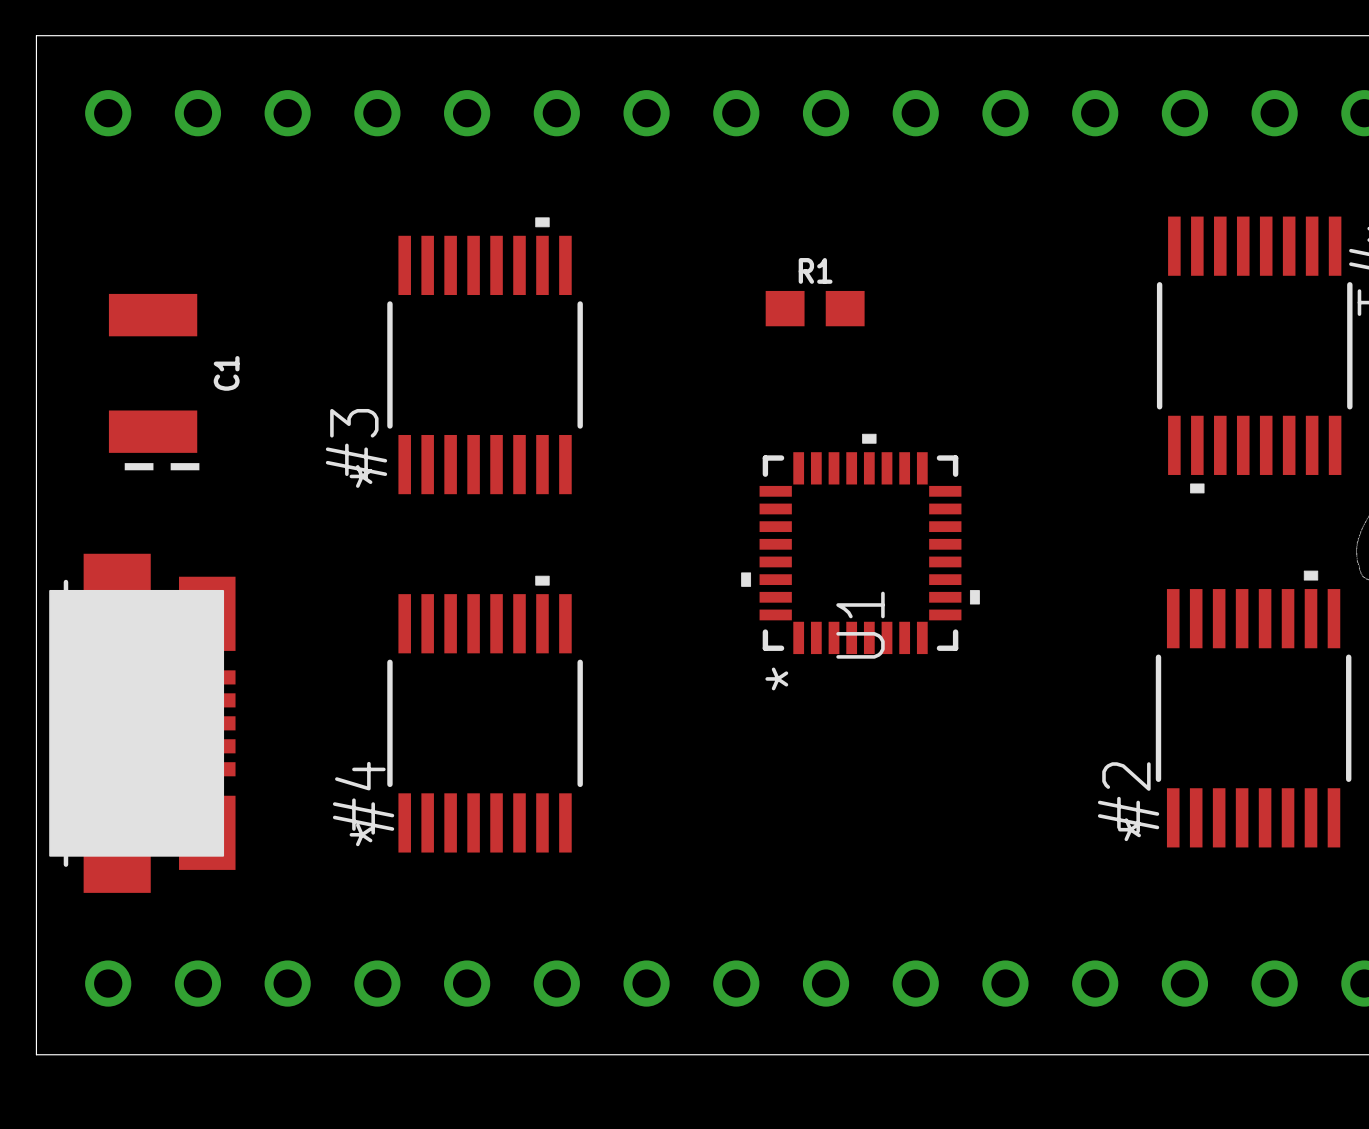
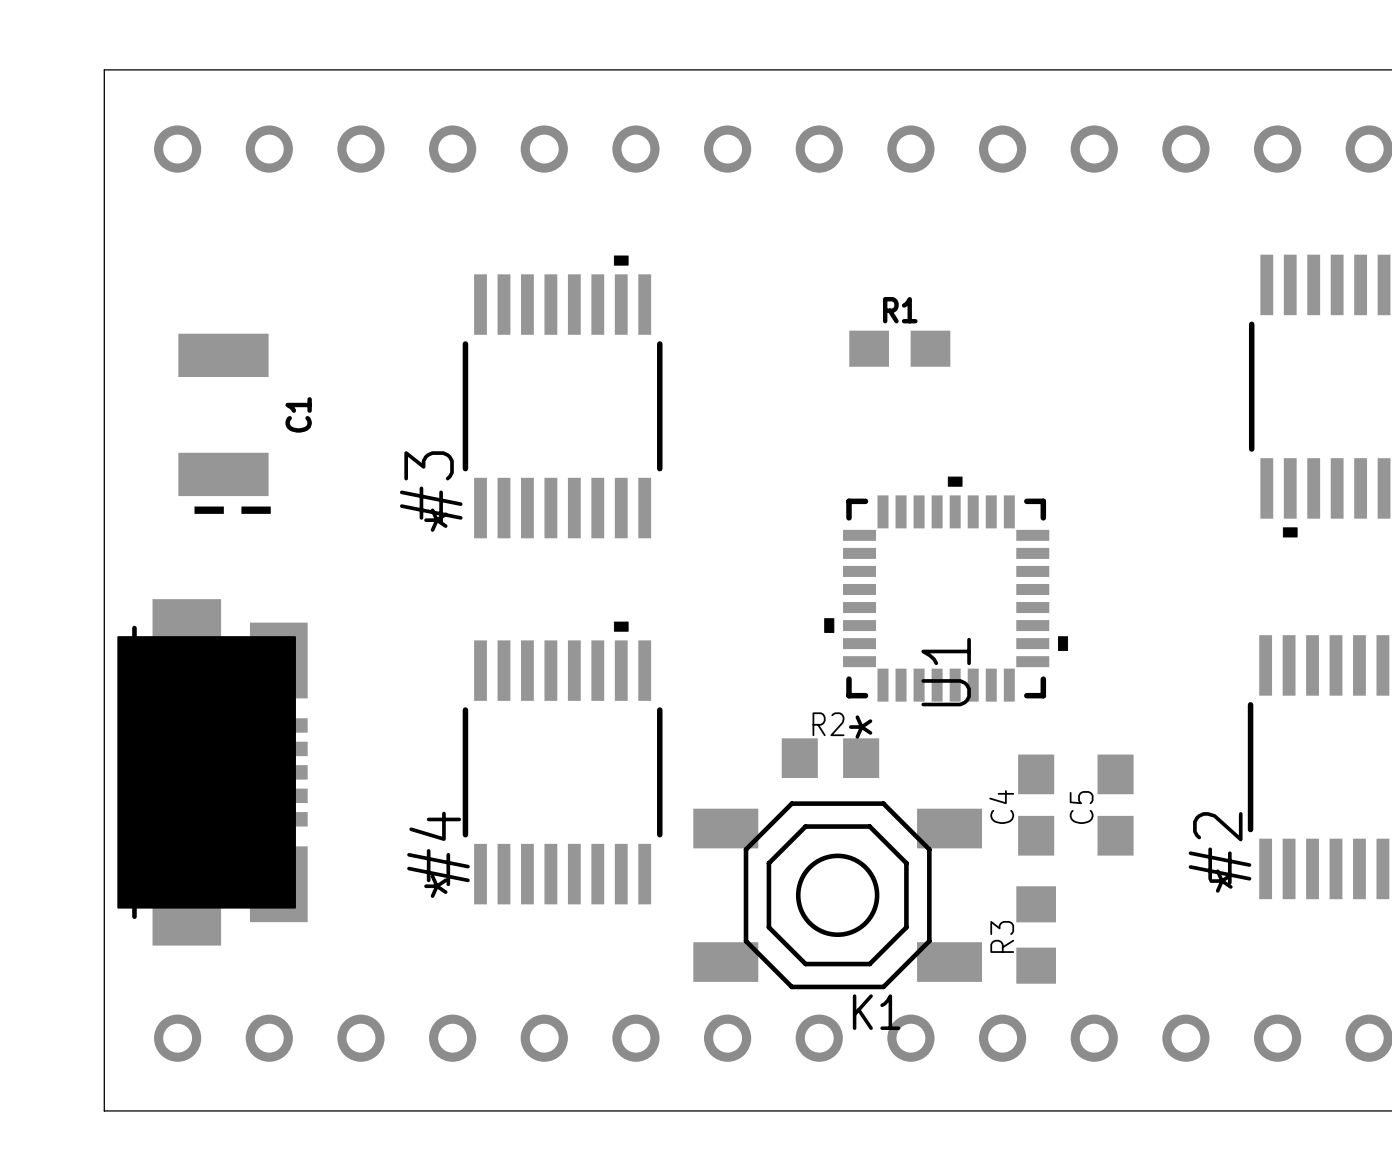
R2: none -> (830, 758)
C4: none -> (1036, 805)
C5: none -> (1115, 805)
K1: none -> (837, 895)
R3: none -> (1036, 934)

